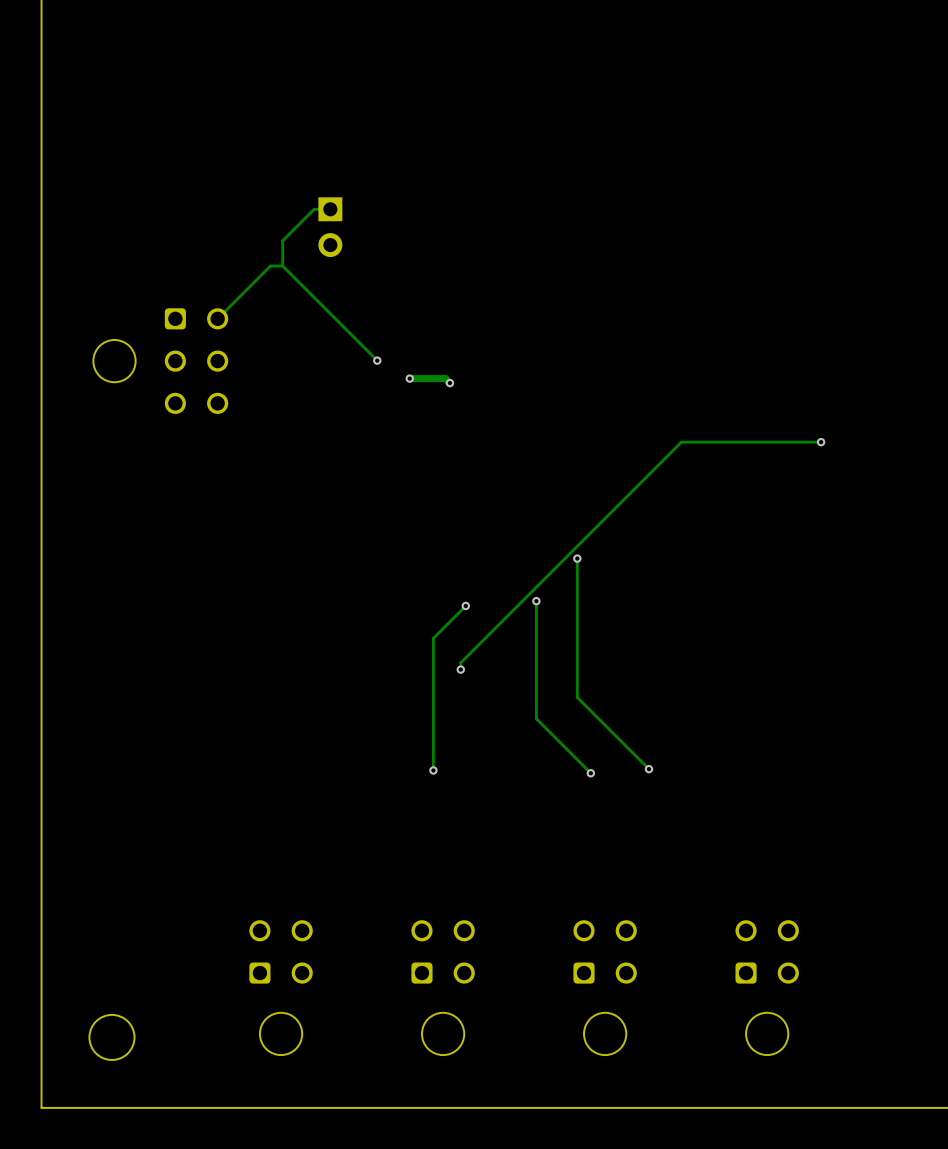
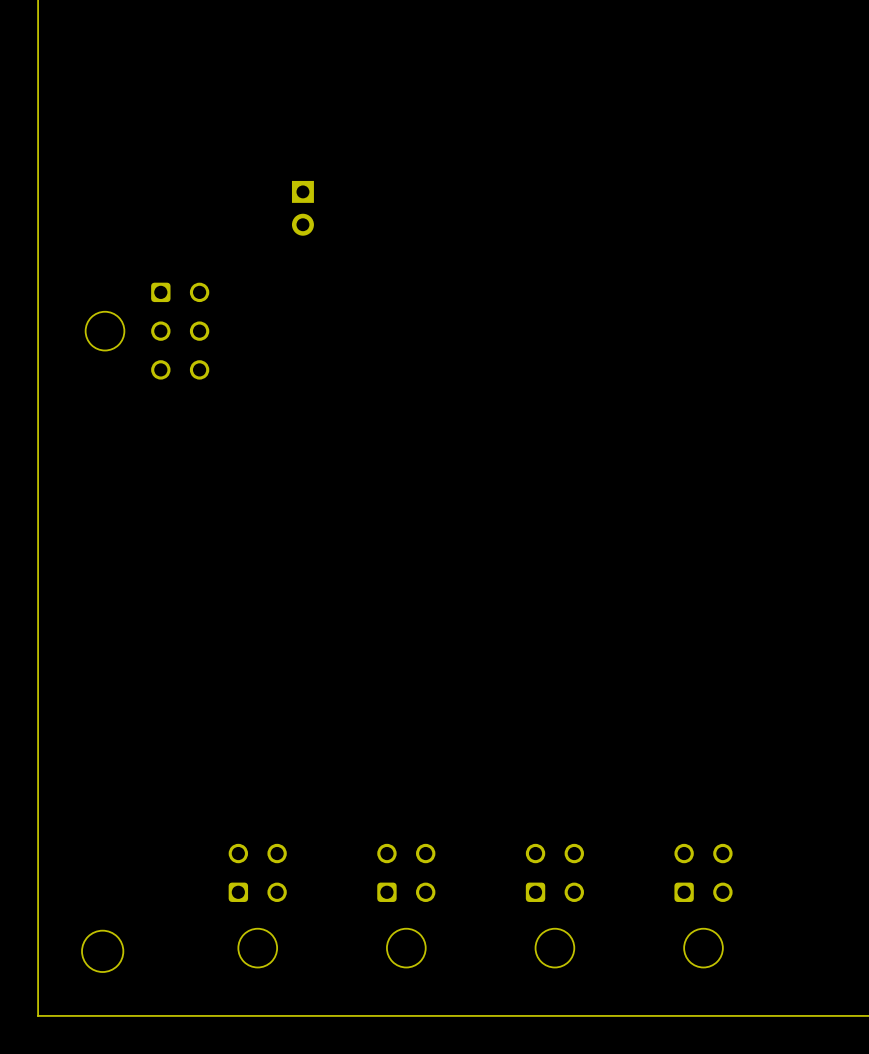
track: (330, 209) (314, 209) (282, 240) (282, 266) -> none
track: (282, 266) (270, 266) (217, 318) -> none
track: (282, 266) (377, 360) -> none
via: (377, 360) -> none
track: (409, 378) (445, 378) (449, 383) -> none
via: (409, 378) -> none
via: (449, 383) -> none
track: (821, 442) (681, 442) (460, 662) (460, 669) -> none
via: (821, 442) -> none
track: (577, 558) (577, 697) (648, 769) -> none
via: (577, 558) -> none
track: (536, 601) (536, 718) (590, 773) -> none
via: (536, 601) -> none
track: (465, 605) (433, 638) (433, 770) -> none
via: (465, 605) -> none
via: (460, 669) -> none
via: (648, 769) -> none
via: (433, 770) -> none
via: (590, 773) -> none

